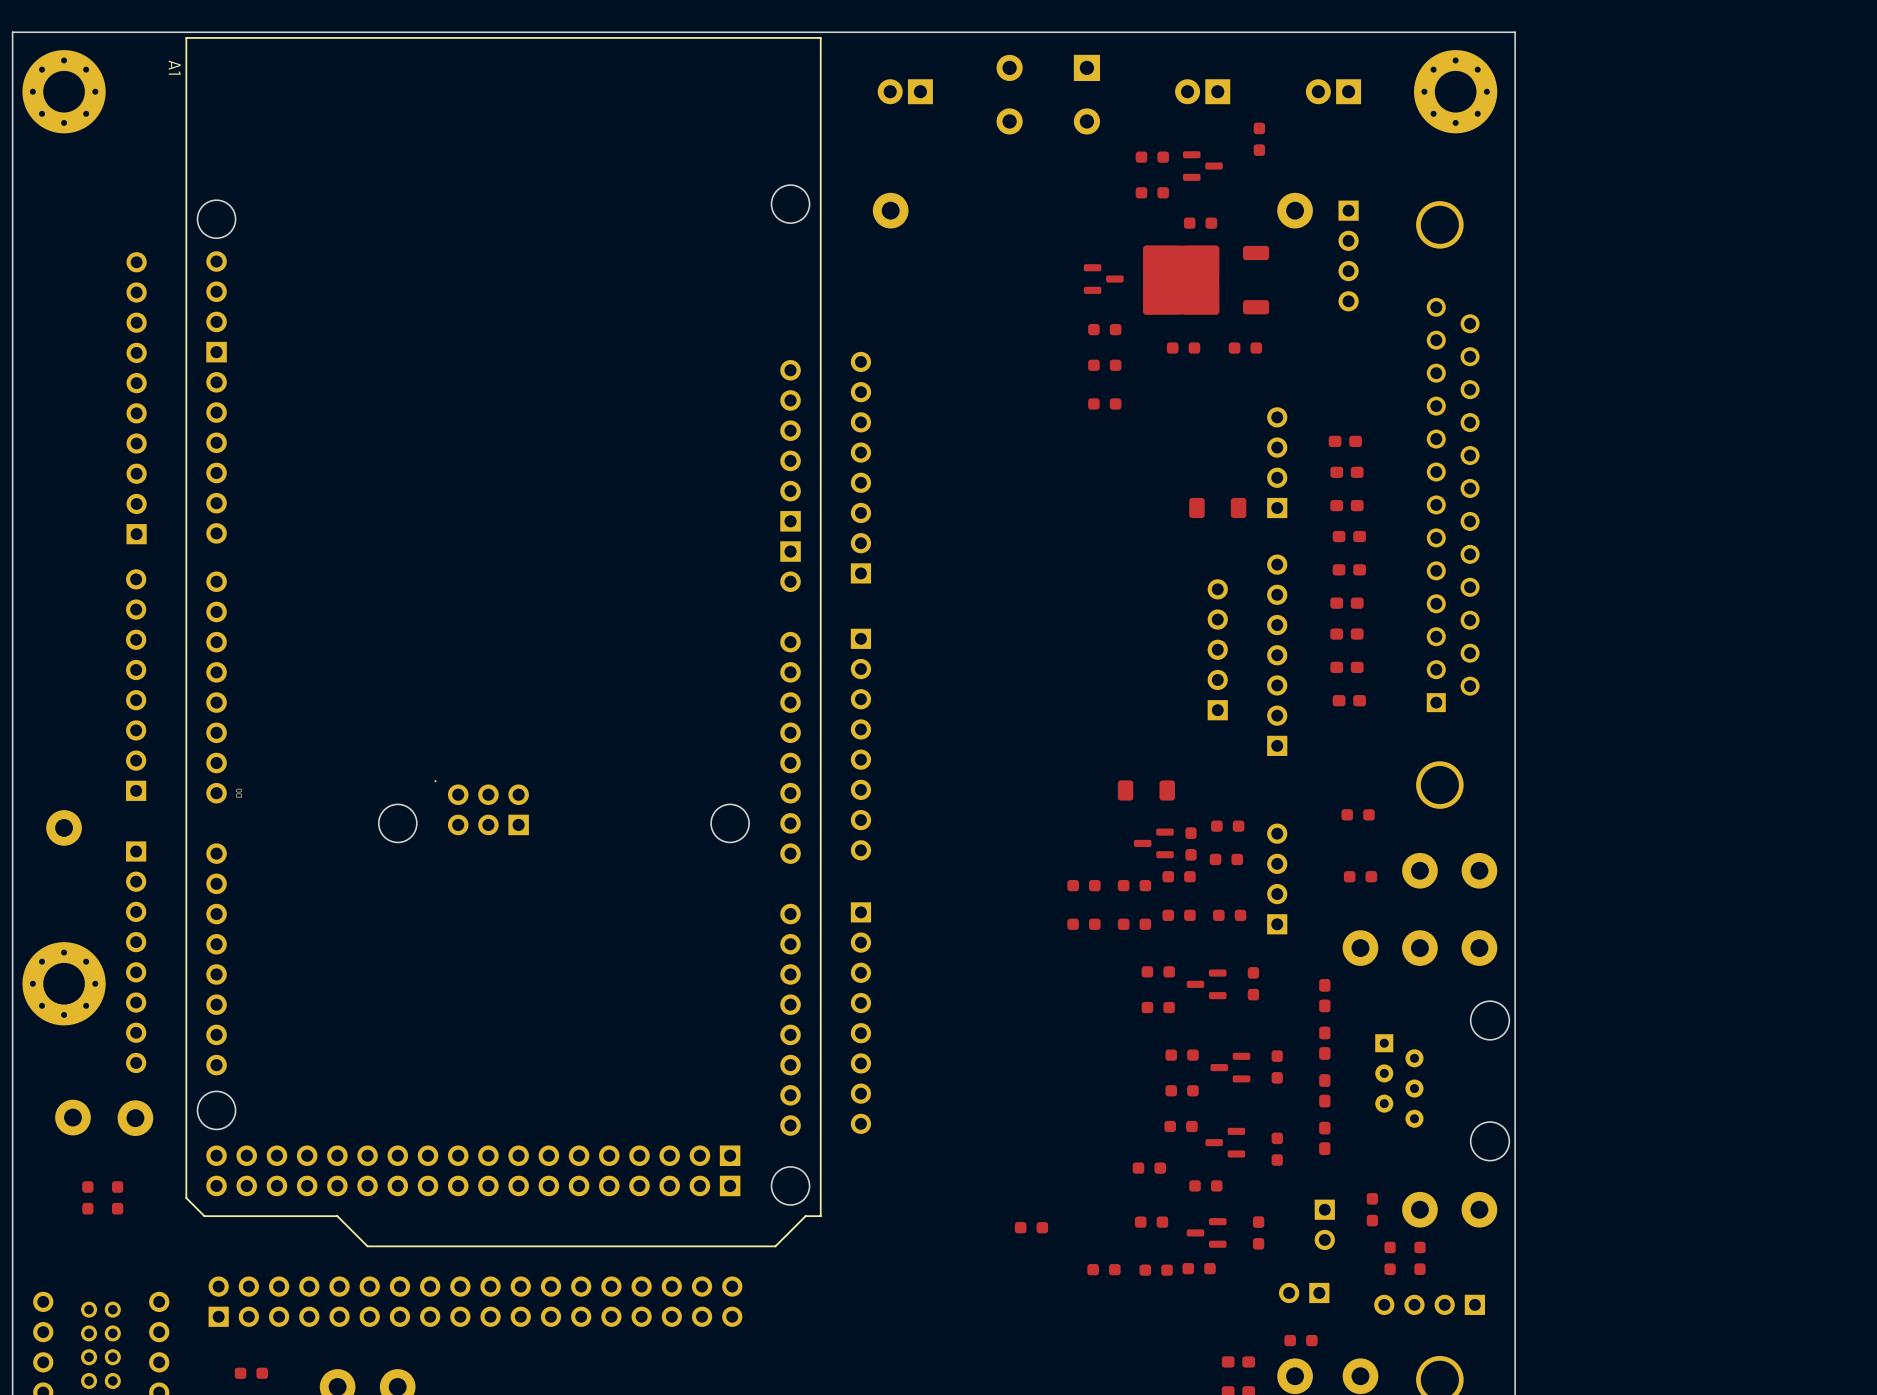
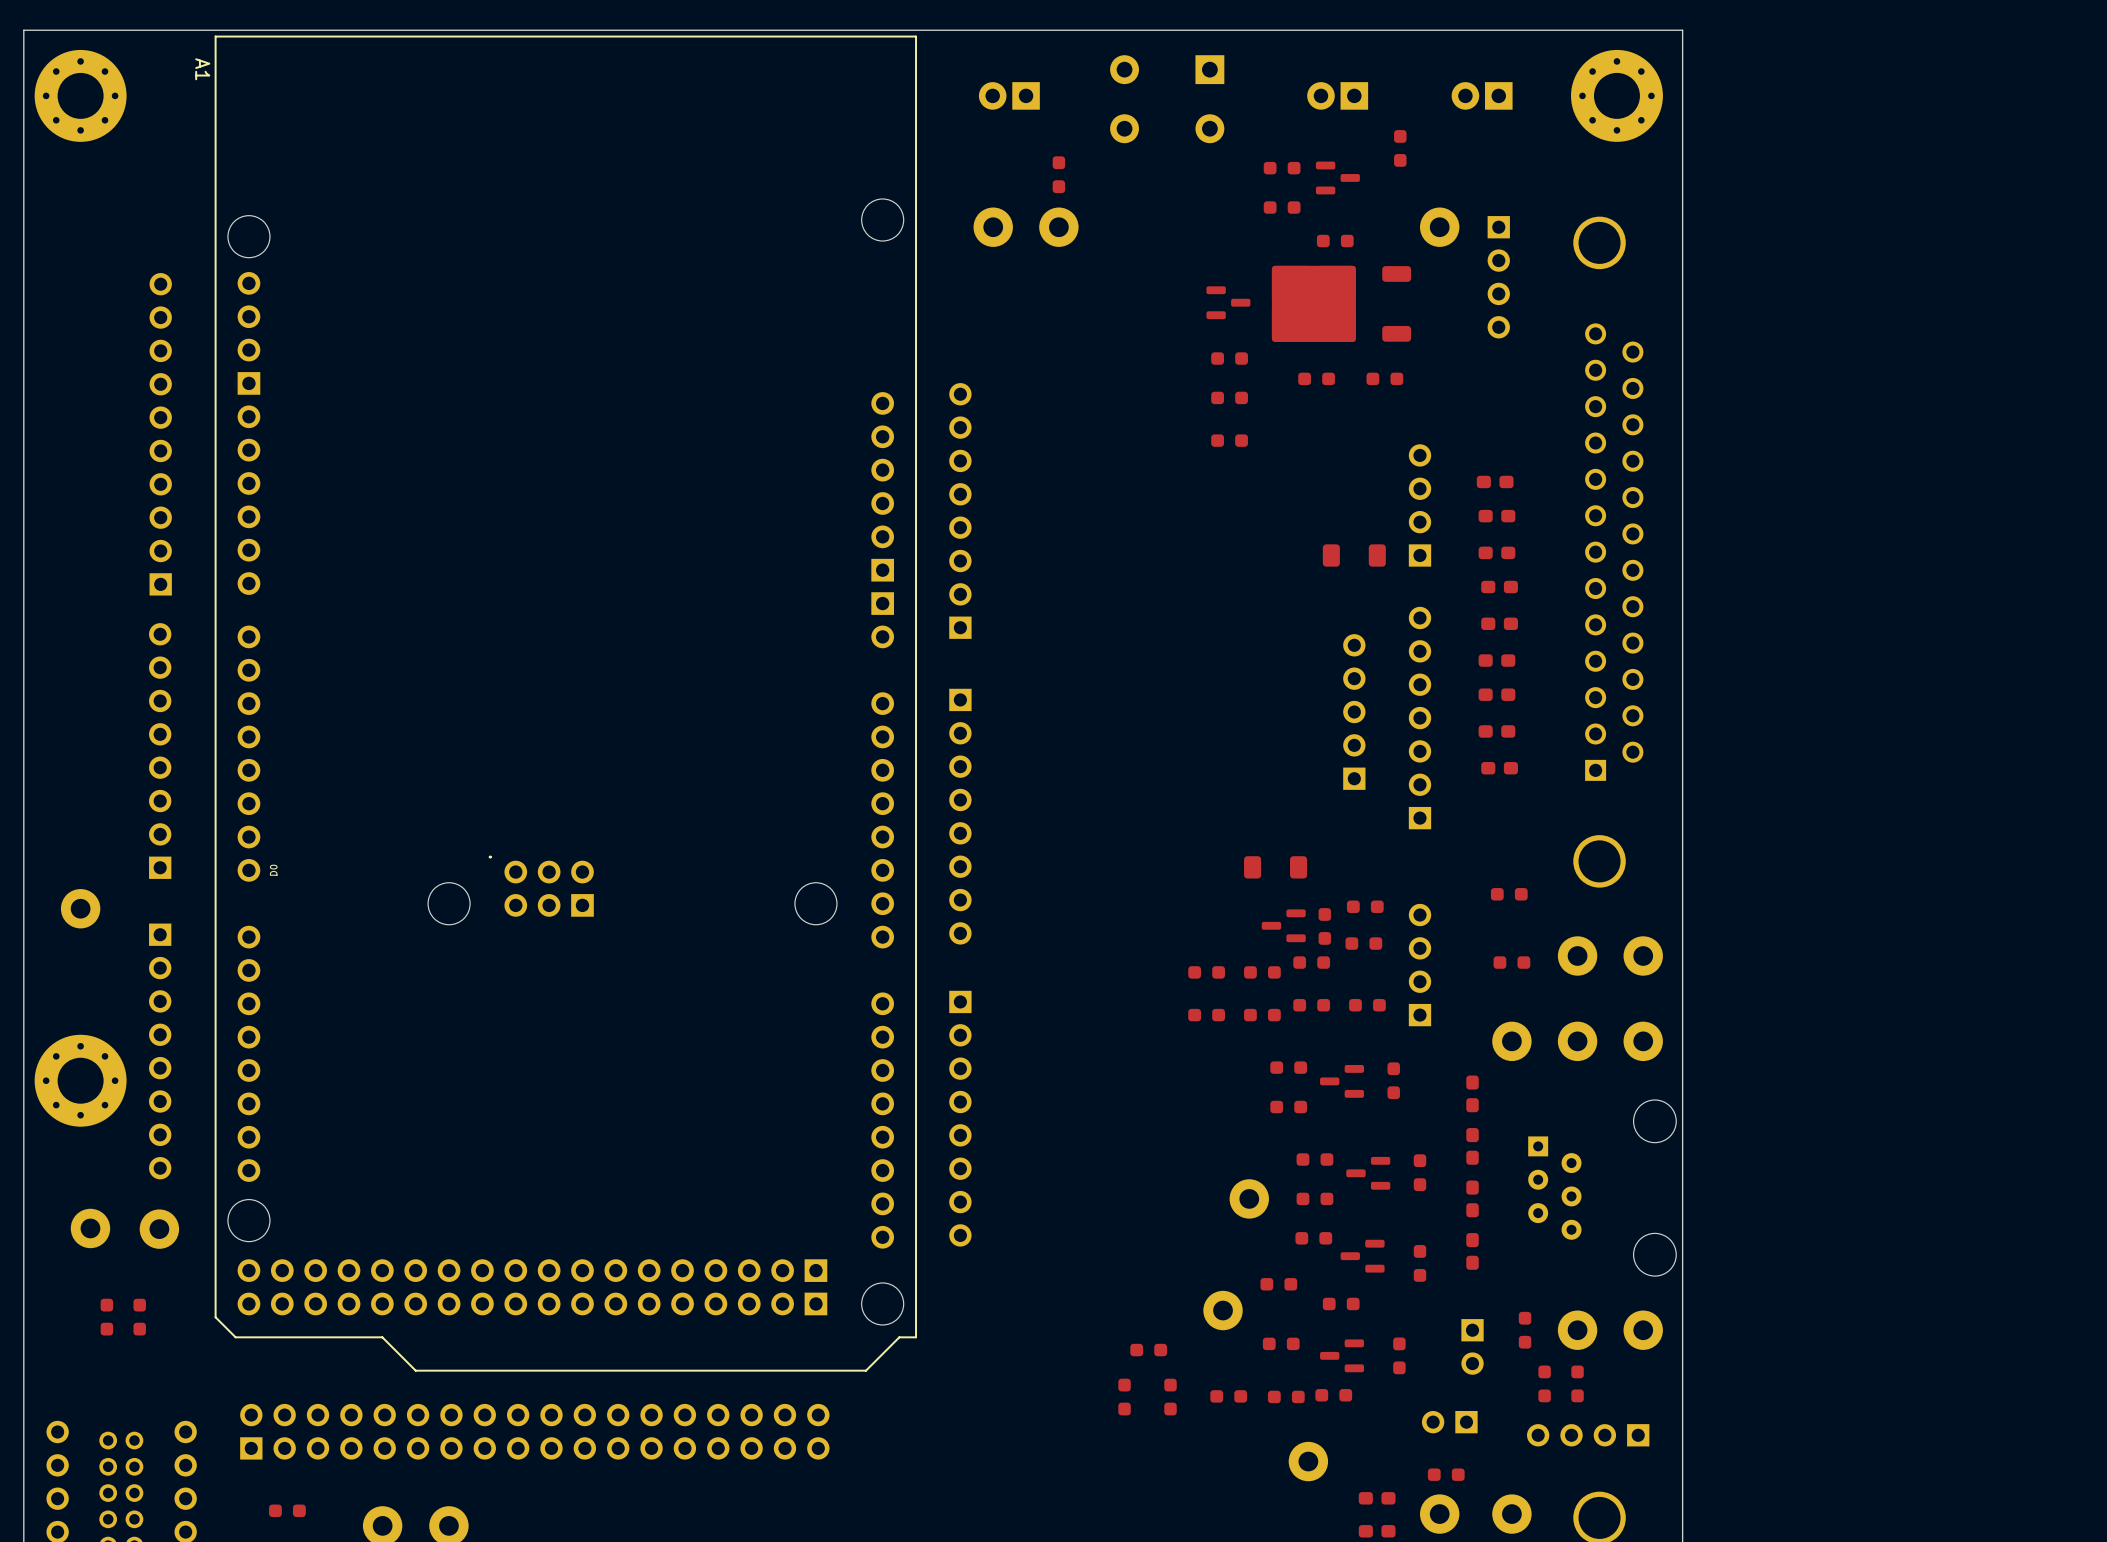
part: none -> (1058, 174)
part: none -> (1058, 227)
part: none -> (1249, 1198)
part: none -> (1223, 1310)
part: none -> (1124, 1397)
part: none -> (1170, 1397)
part: none -> (1308, 1461)

